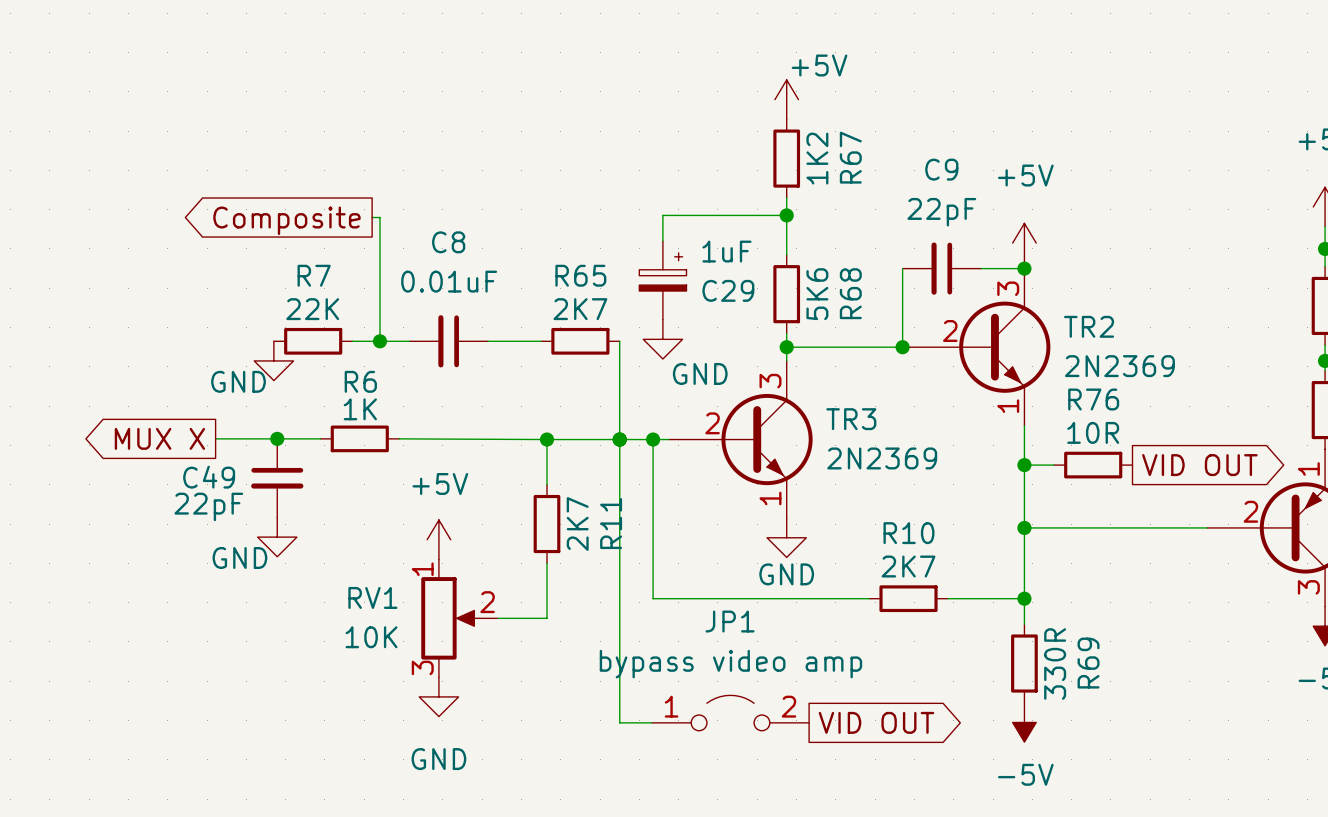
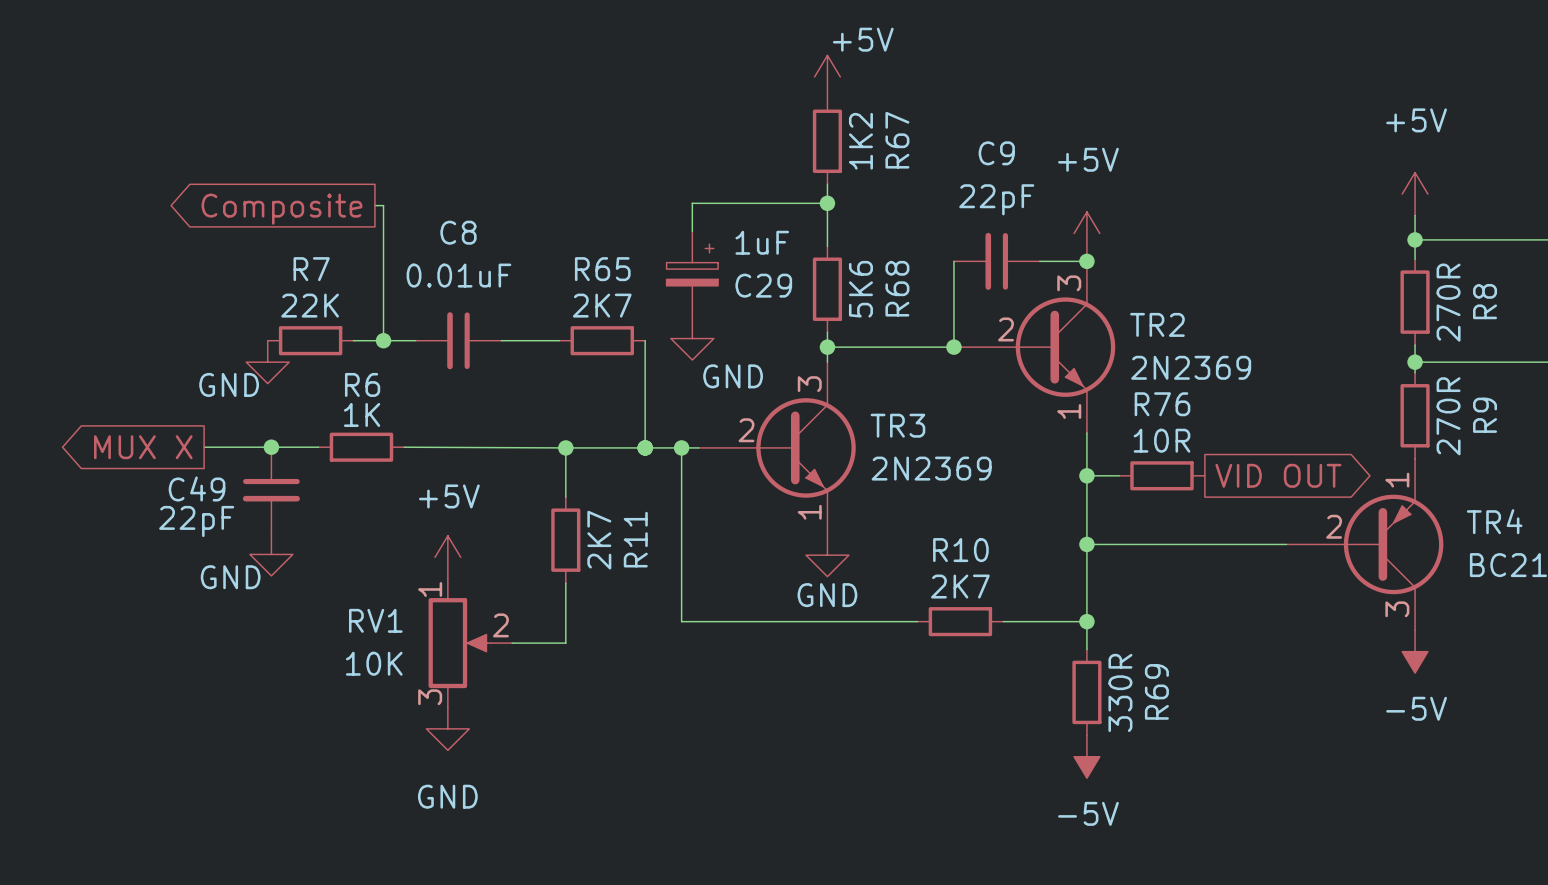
wire: (619, 439) (619, 722) (651, 722) -> none
JP1: bypass video amp (730, 713) -> none
global label: VID OUT (876, 722) -> none

